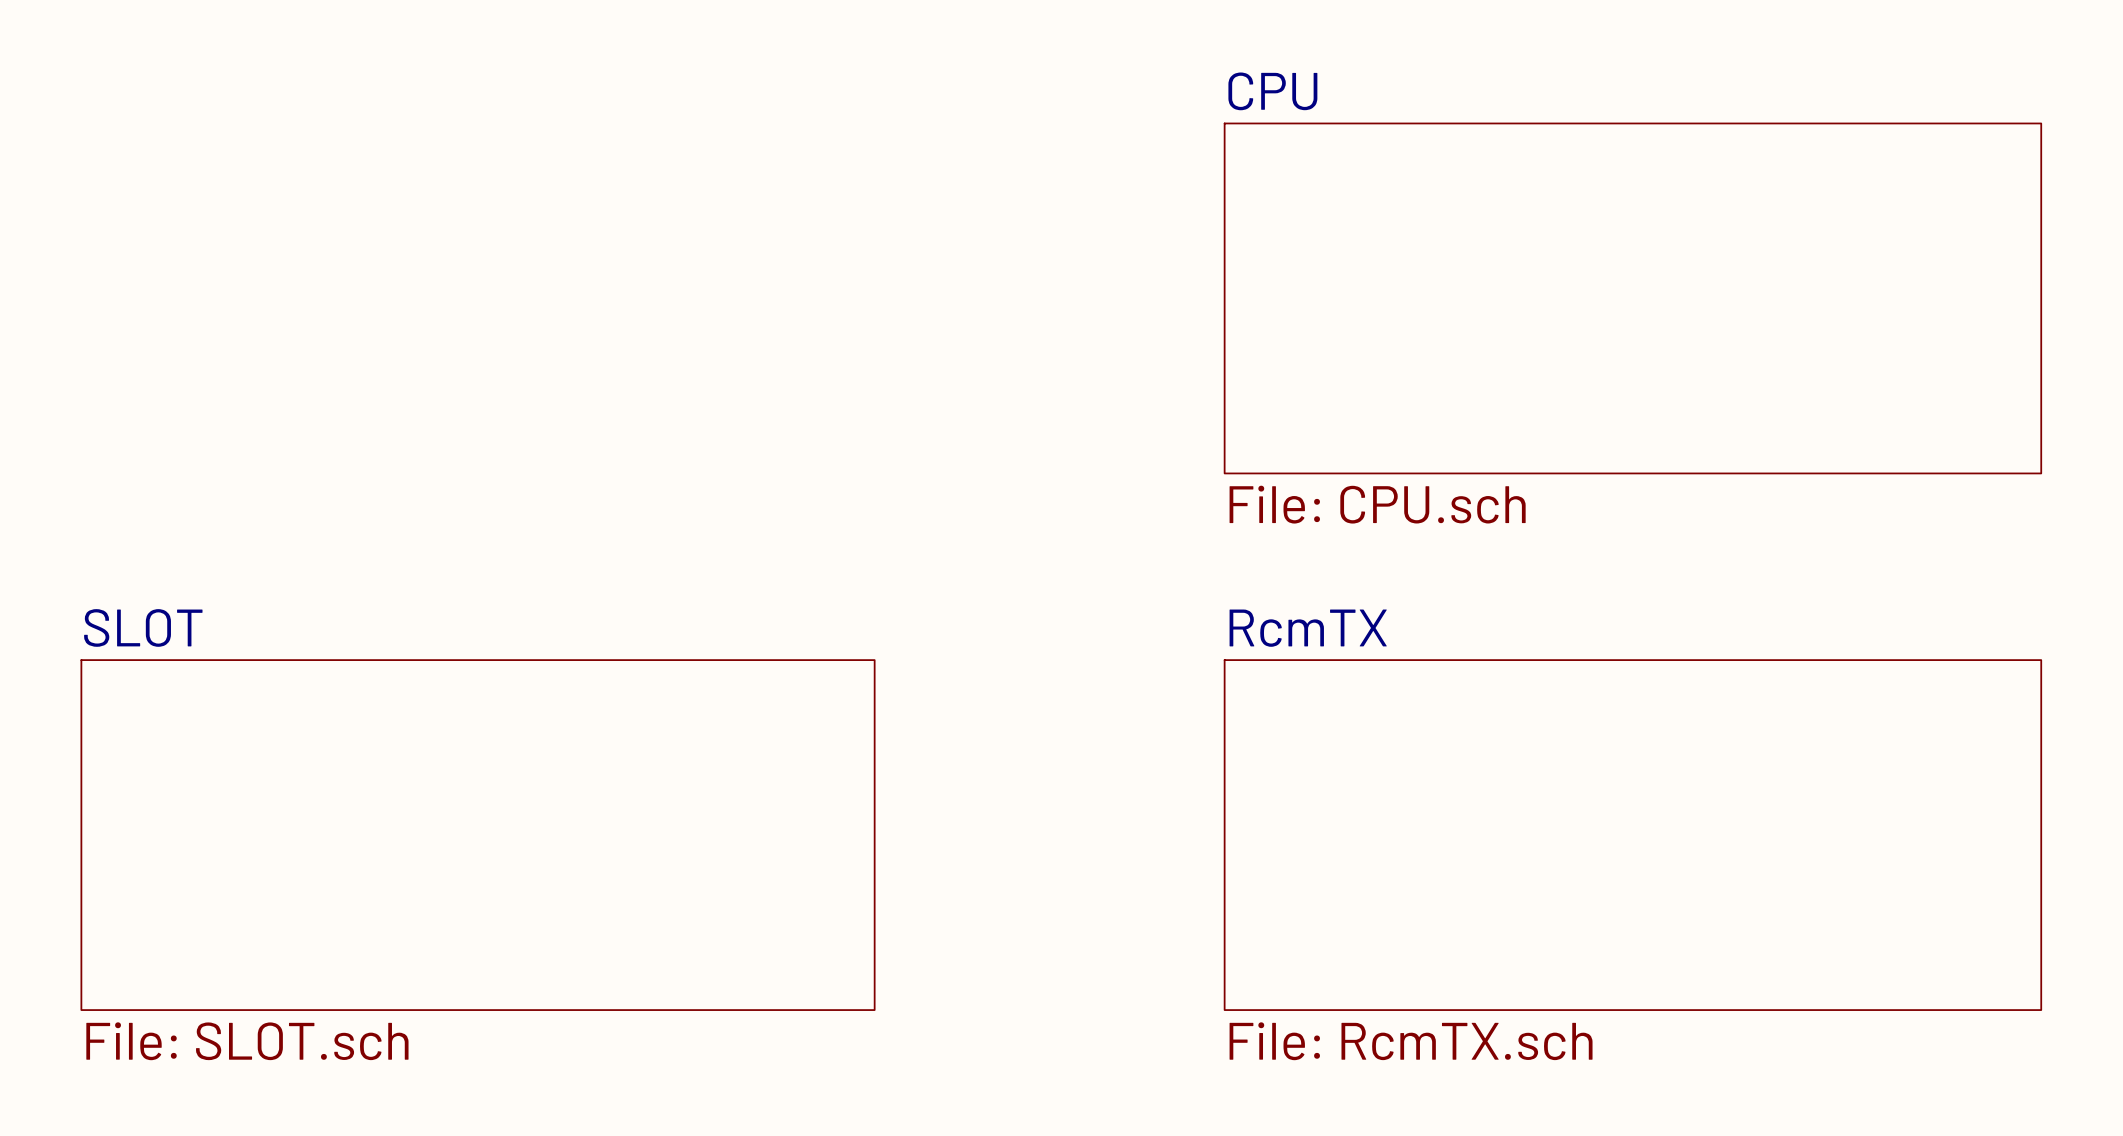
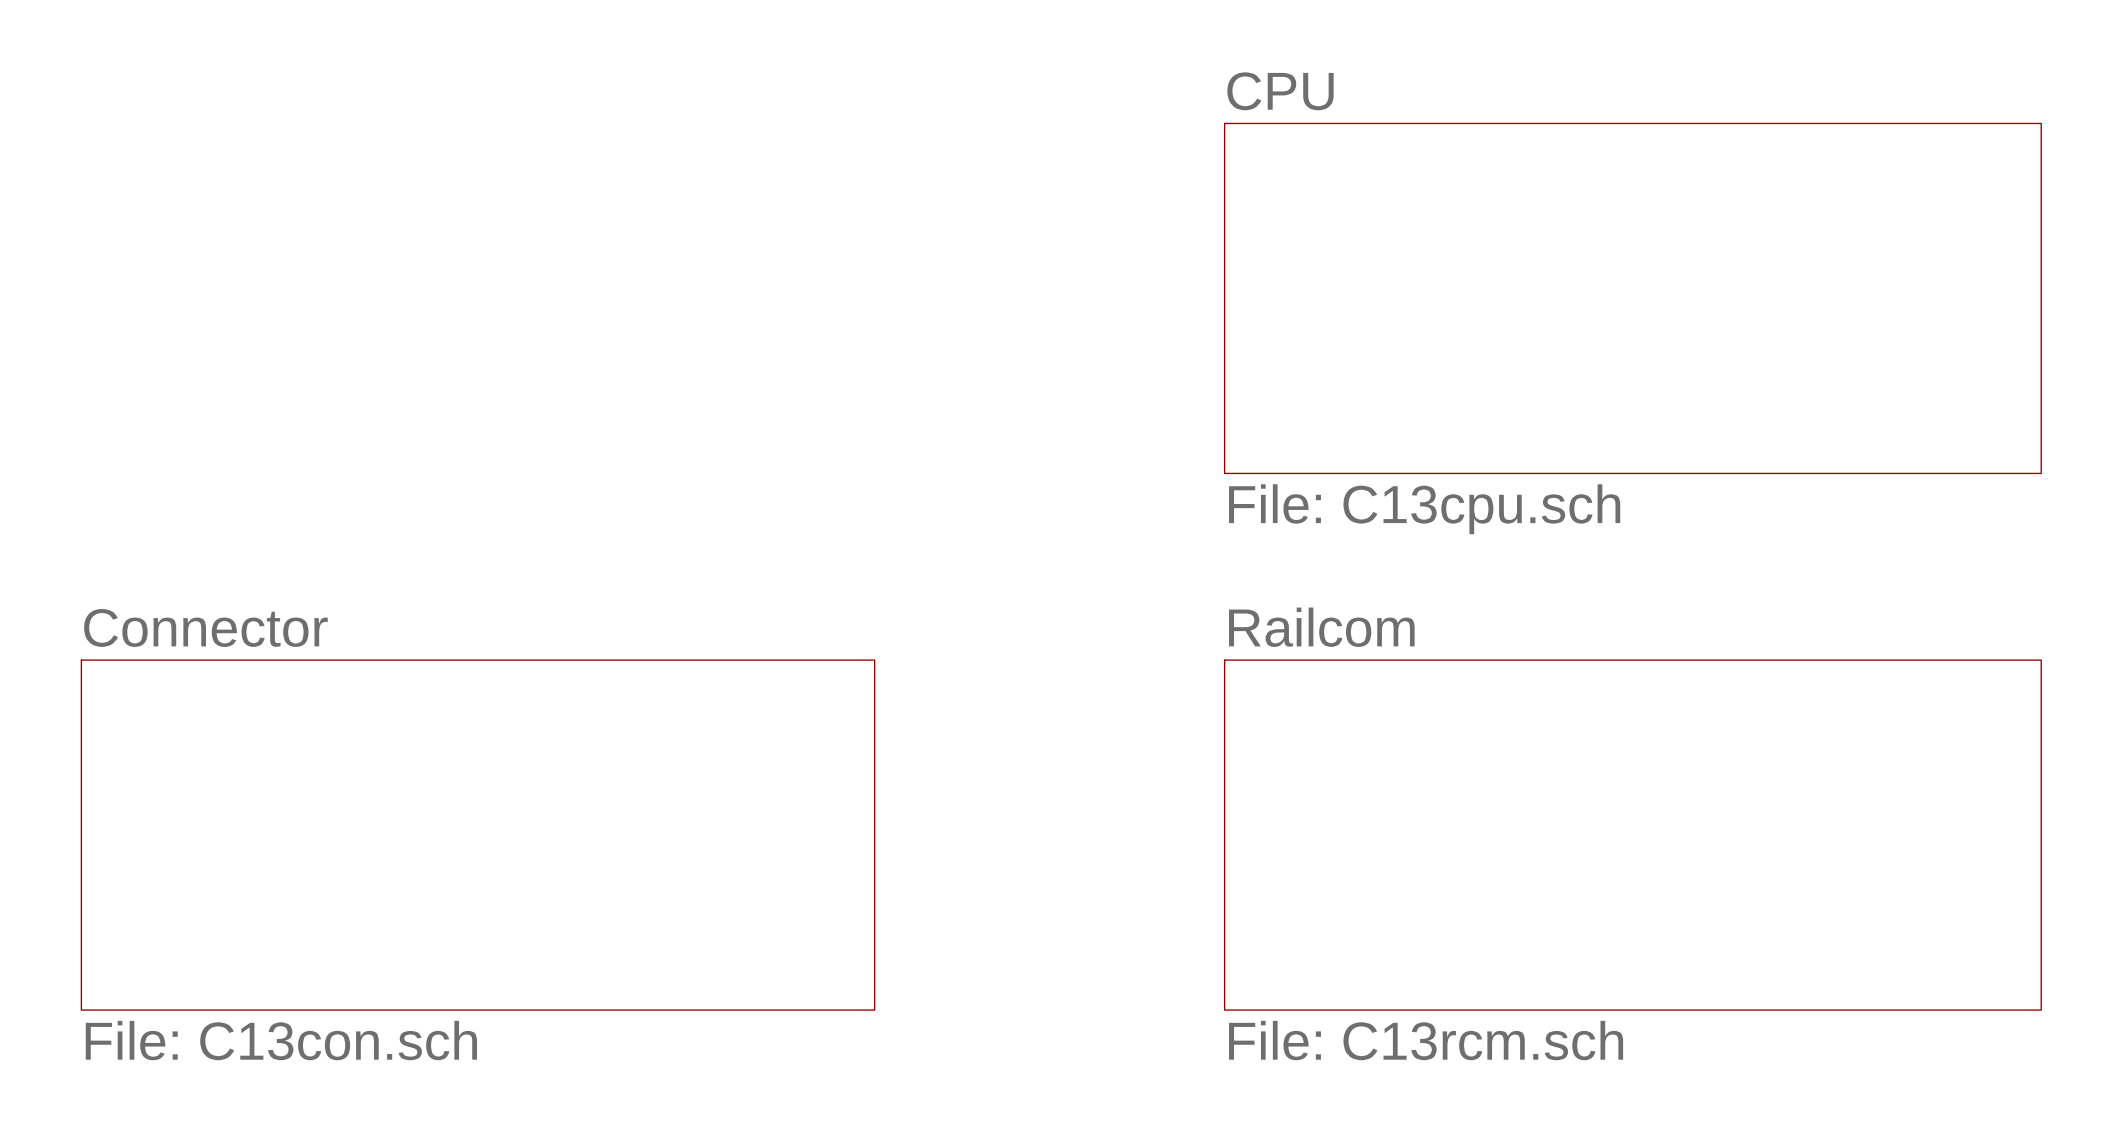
sheet CPU value: File: CPU.sch (1377, 504) -> File: C13cpu.sch (1424, 509)
sheet SLOT name: SLOT (143, 627) -> Connector (205, 627)
sheet RcmTX name: RcmTX (1308, 628) -> Railcom (1321, 627)
sheet SLOT value: File: SLOT.sch (247, 1041) -> File: C13con.sch (281, 1040)
sheet RcmTX value: File: RcmTX.sch (1411, 1041) -> File: C13rcm.sch (1426, 1040)

